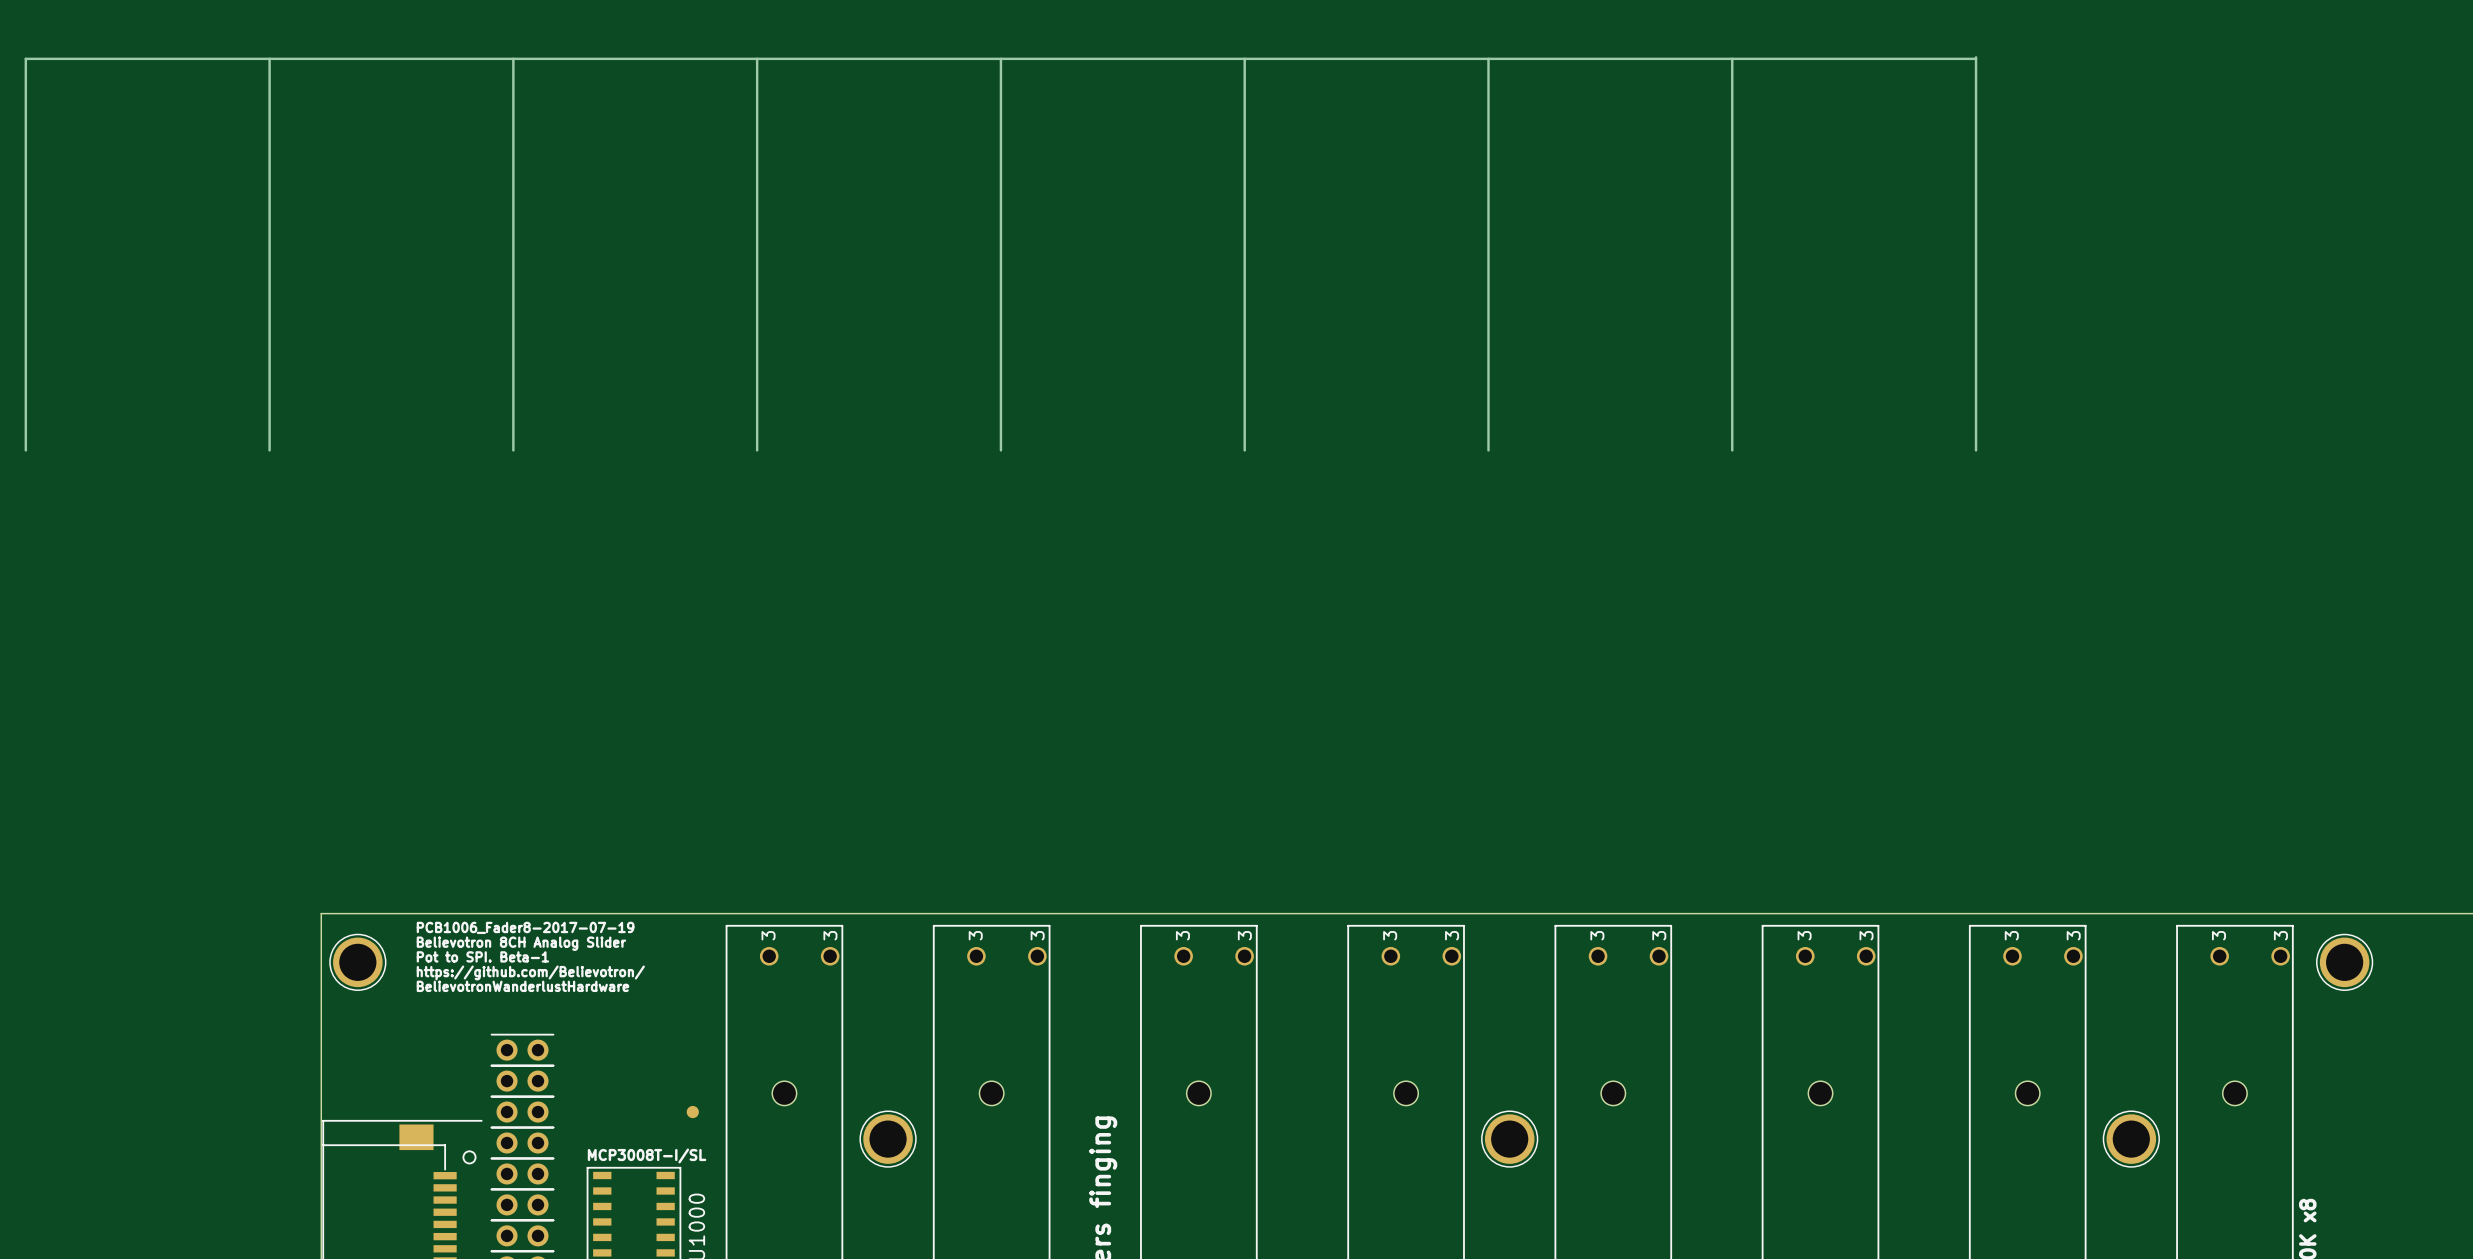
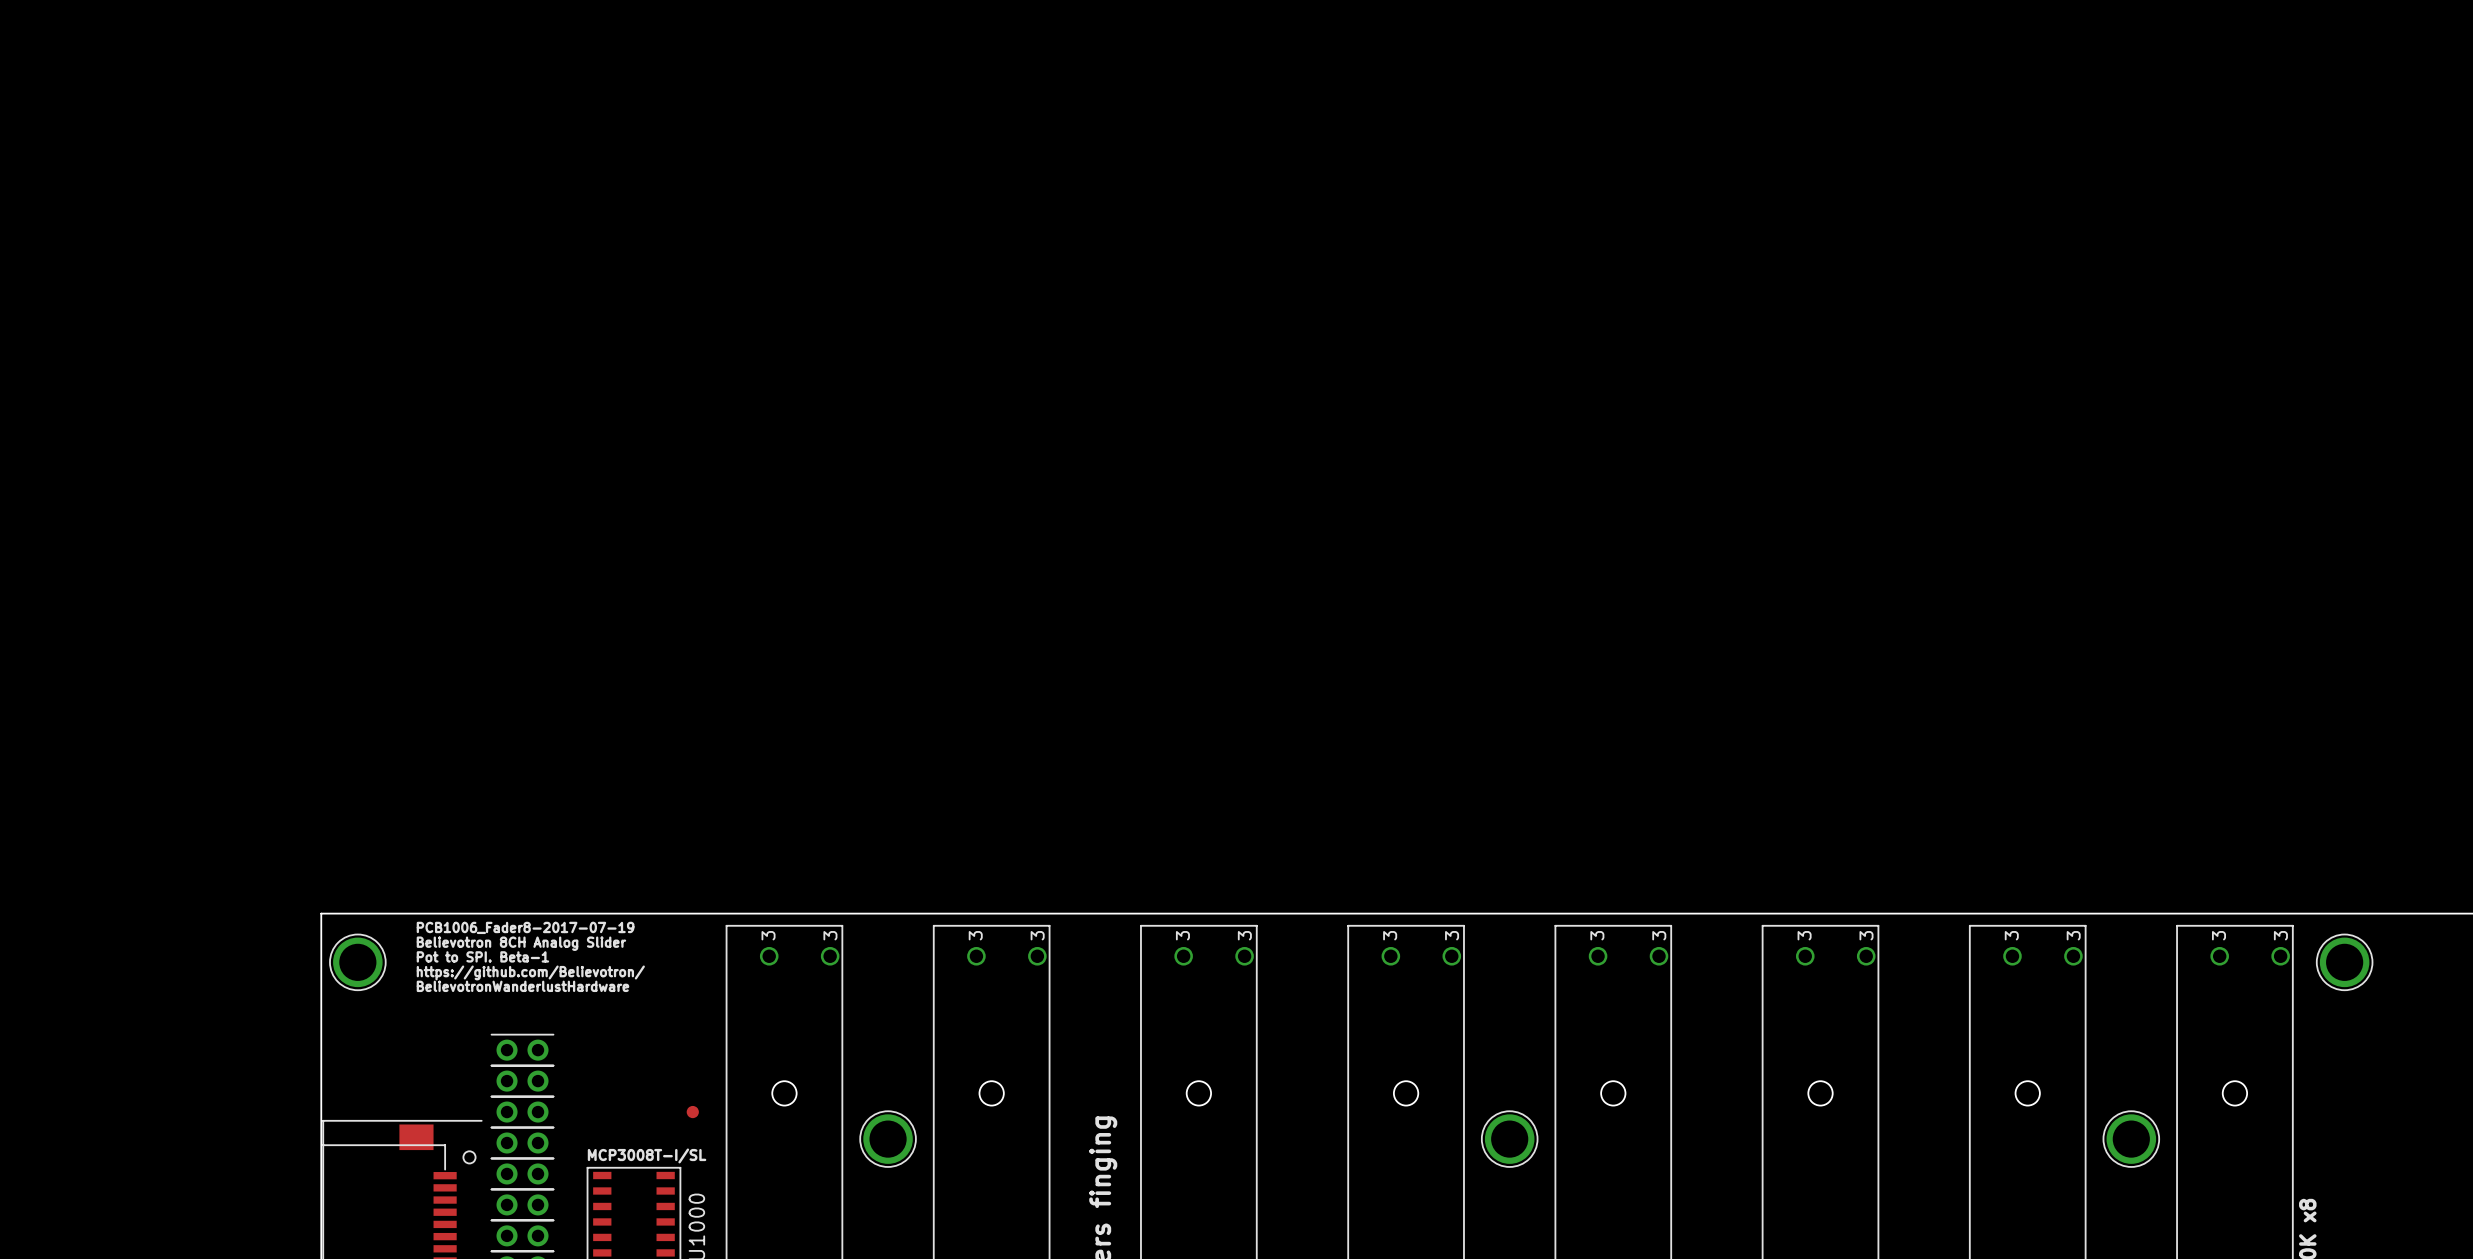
line: (1976, 57) (1976, 450) -> none
line: (269, 58) (269, 450) -> none
line: (513, 58) (513, 450) -> none
line: (757, 58) (757, 450) -> none
line: (1000, 58) (1000, 450) -> none
line: (1244, 58) (1244, 450) -> none
line: (1488, 58) (1488, 450) -> none
line: (1732, 58) (1732, 450) -> none
line: (1976, 58) (25, 58) (25, 450) -> none

